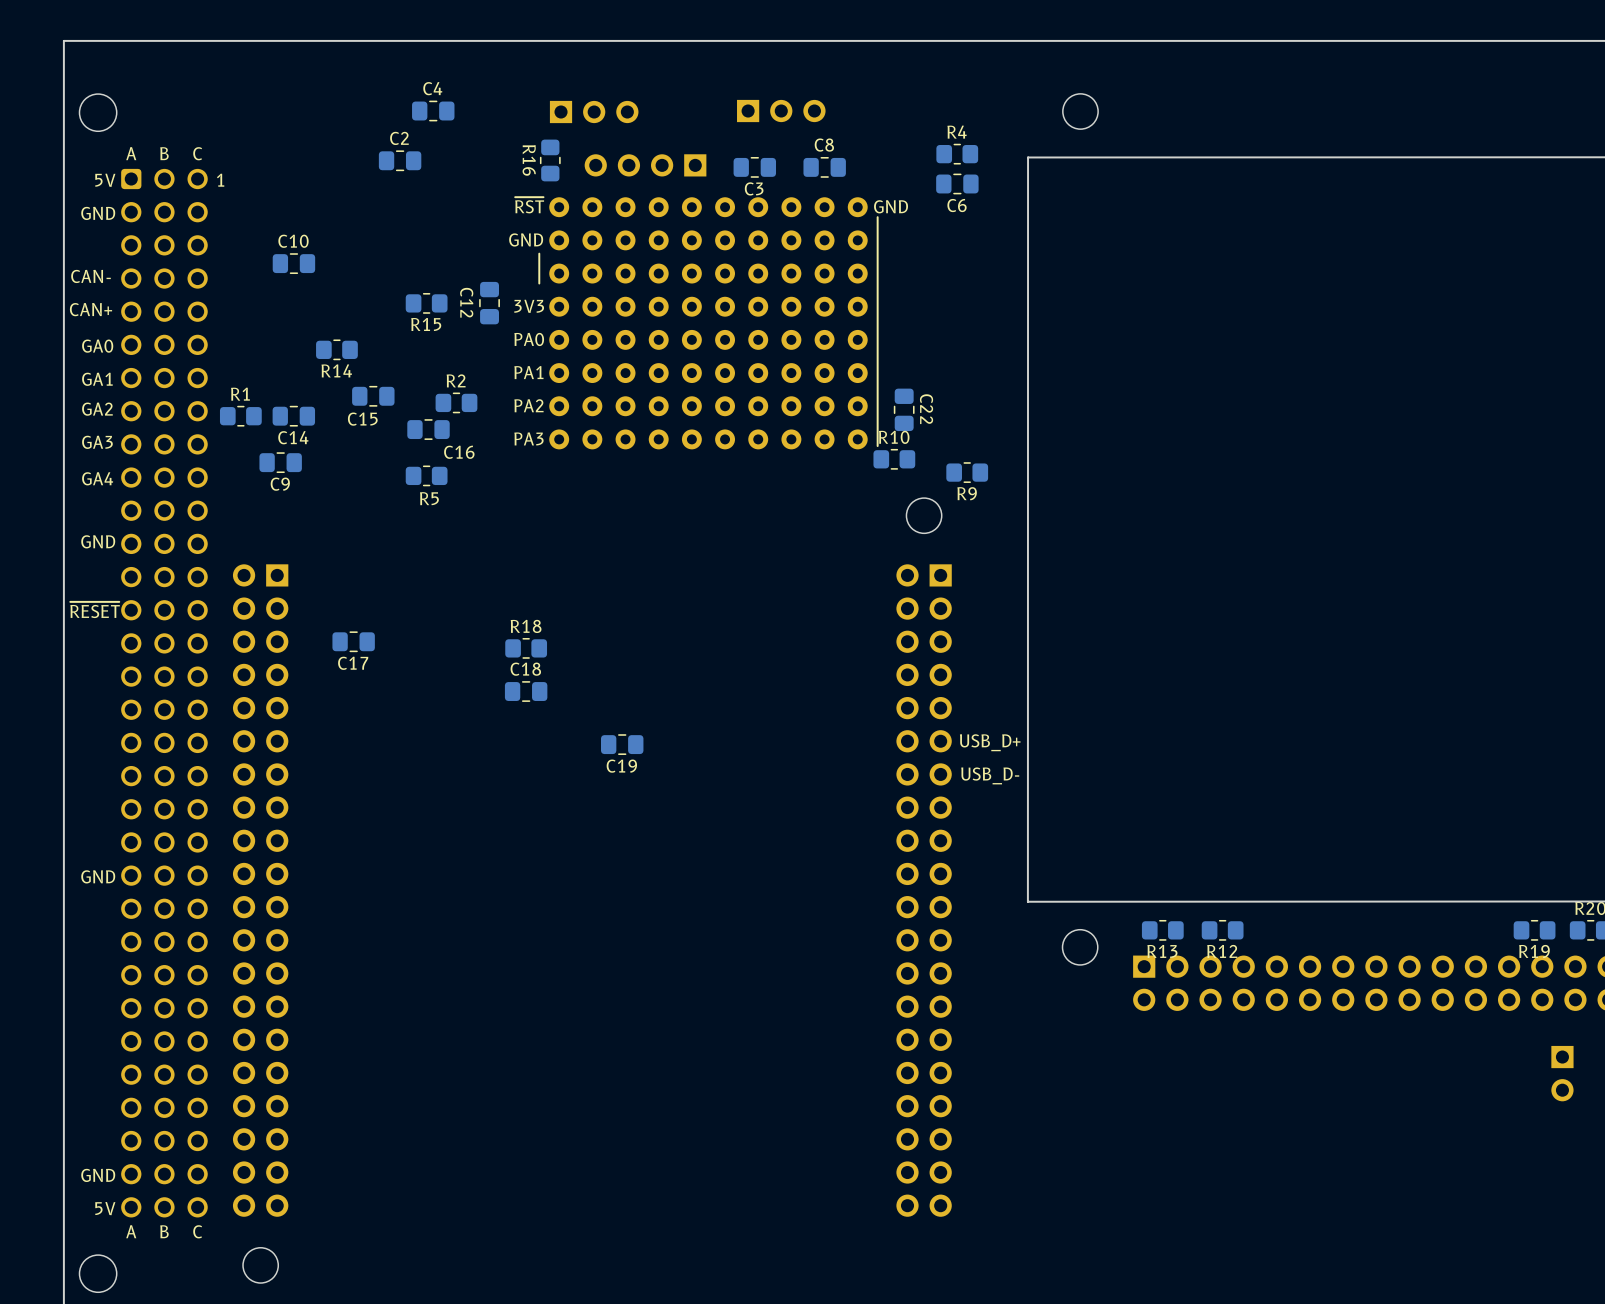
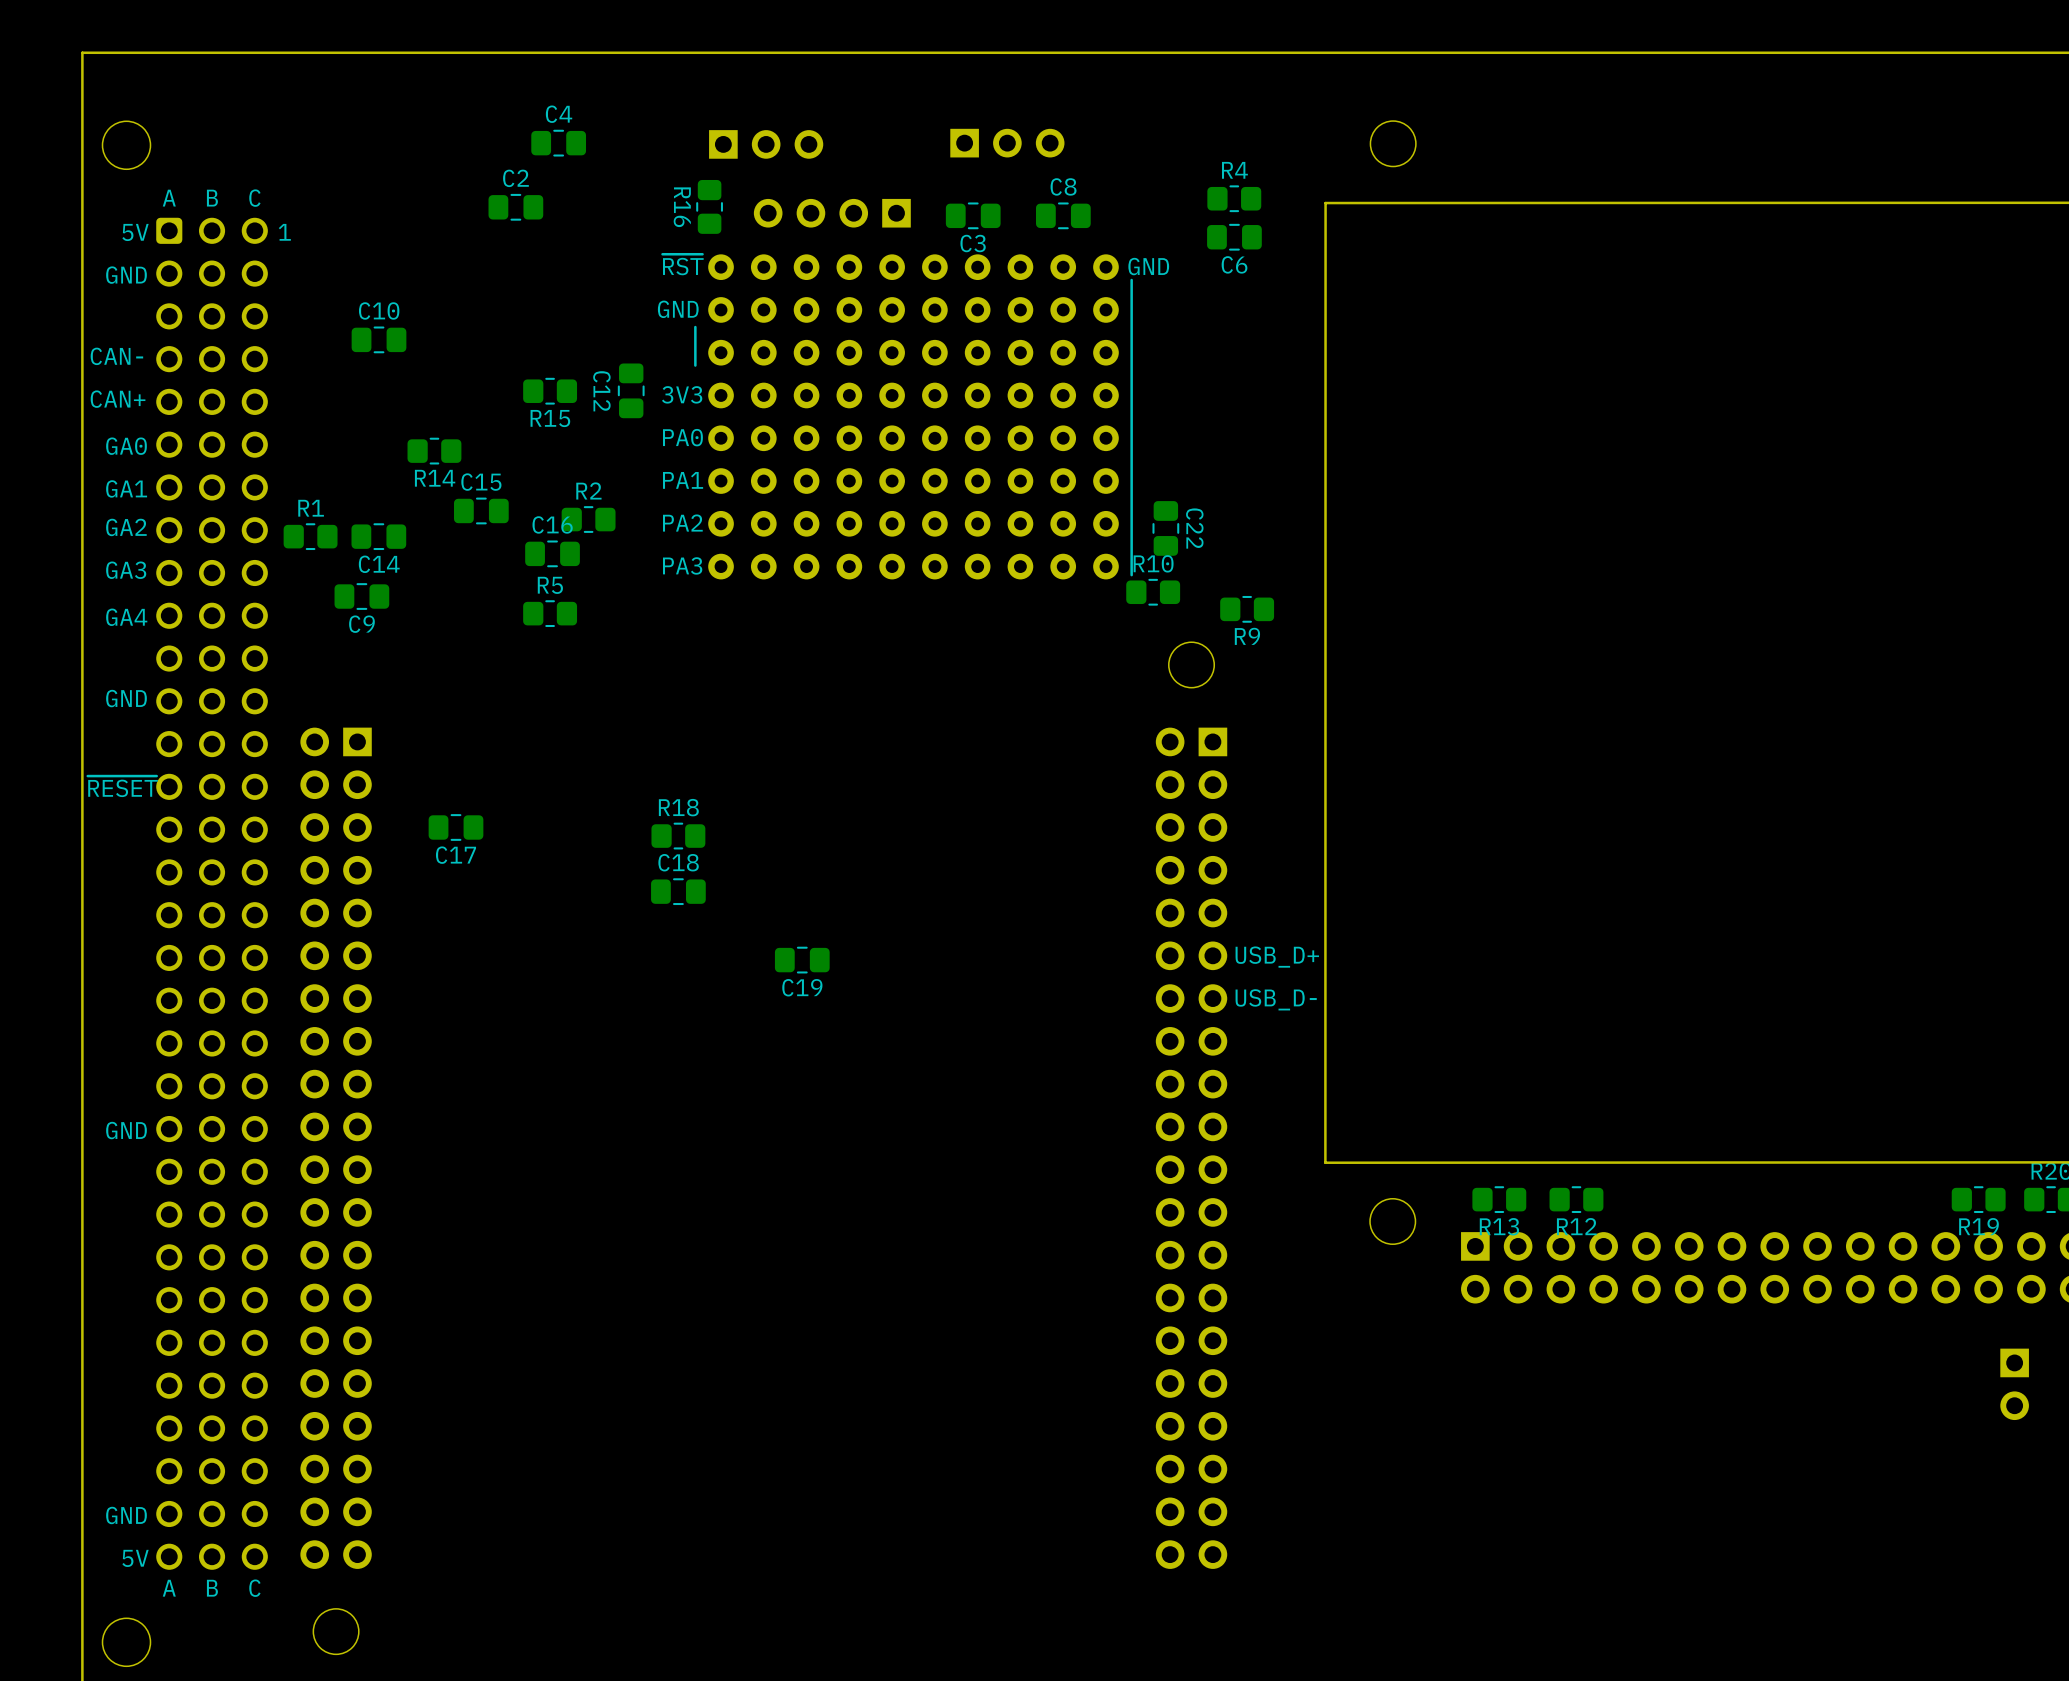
C15 name position: C15 (362, 419) -> C15 (481, 482)
C16 name position: C16 (459, 452) -> C16 (552, 524)
R5 name position: R5 (429, 498) -> R5 (550, 585)

